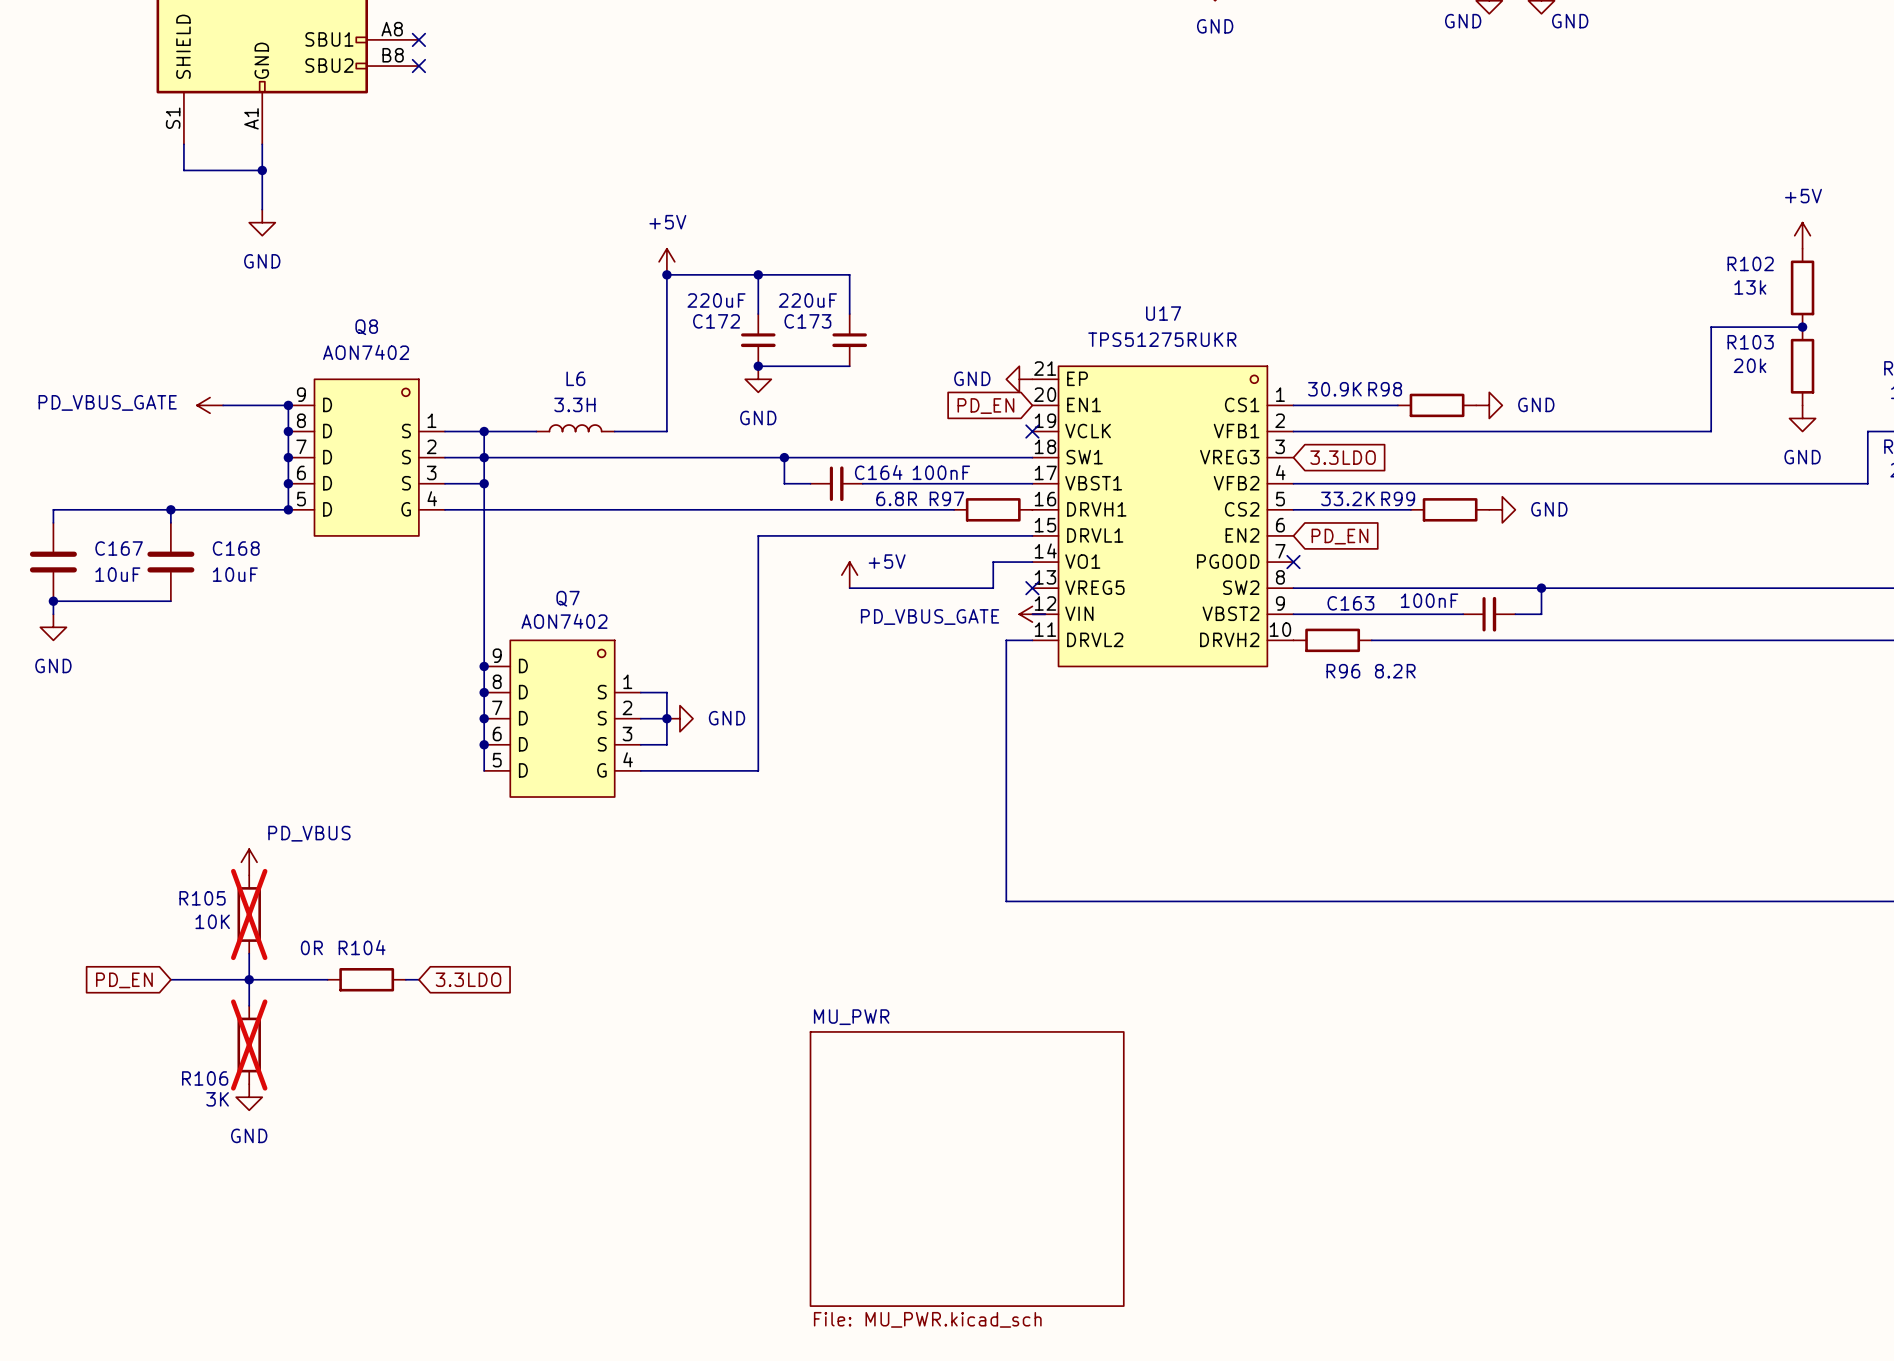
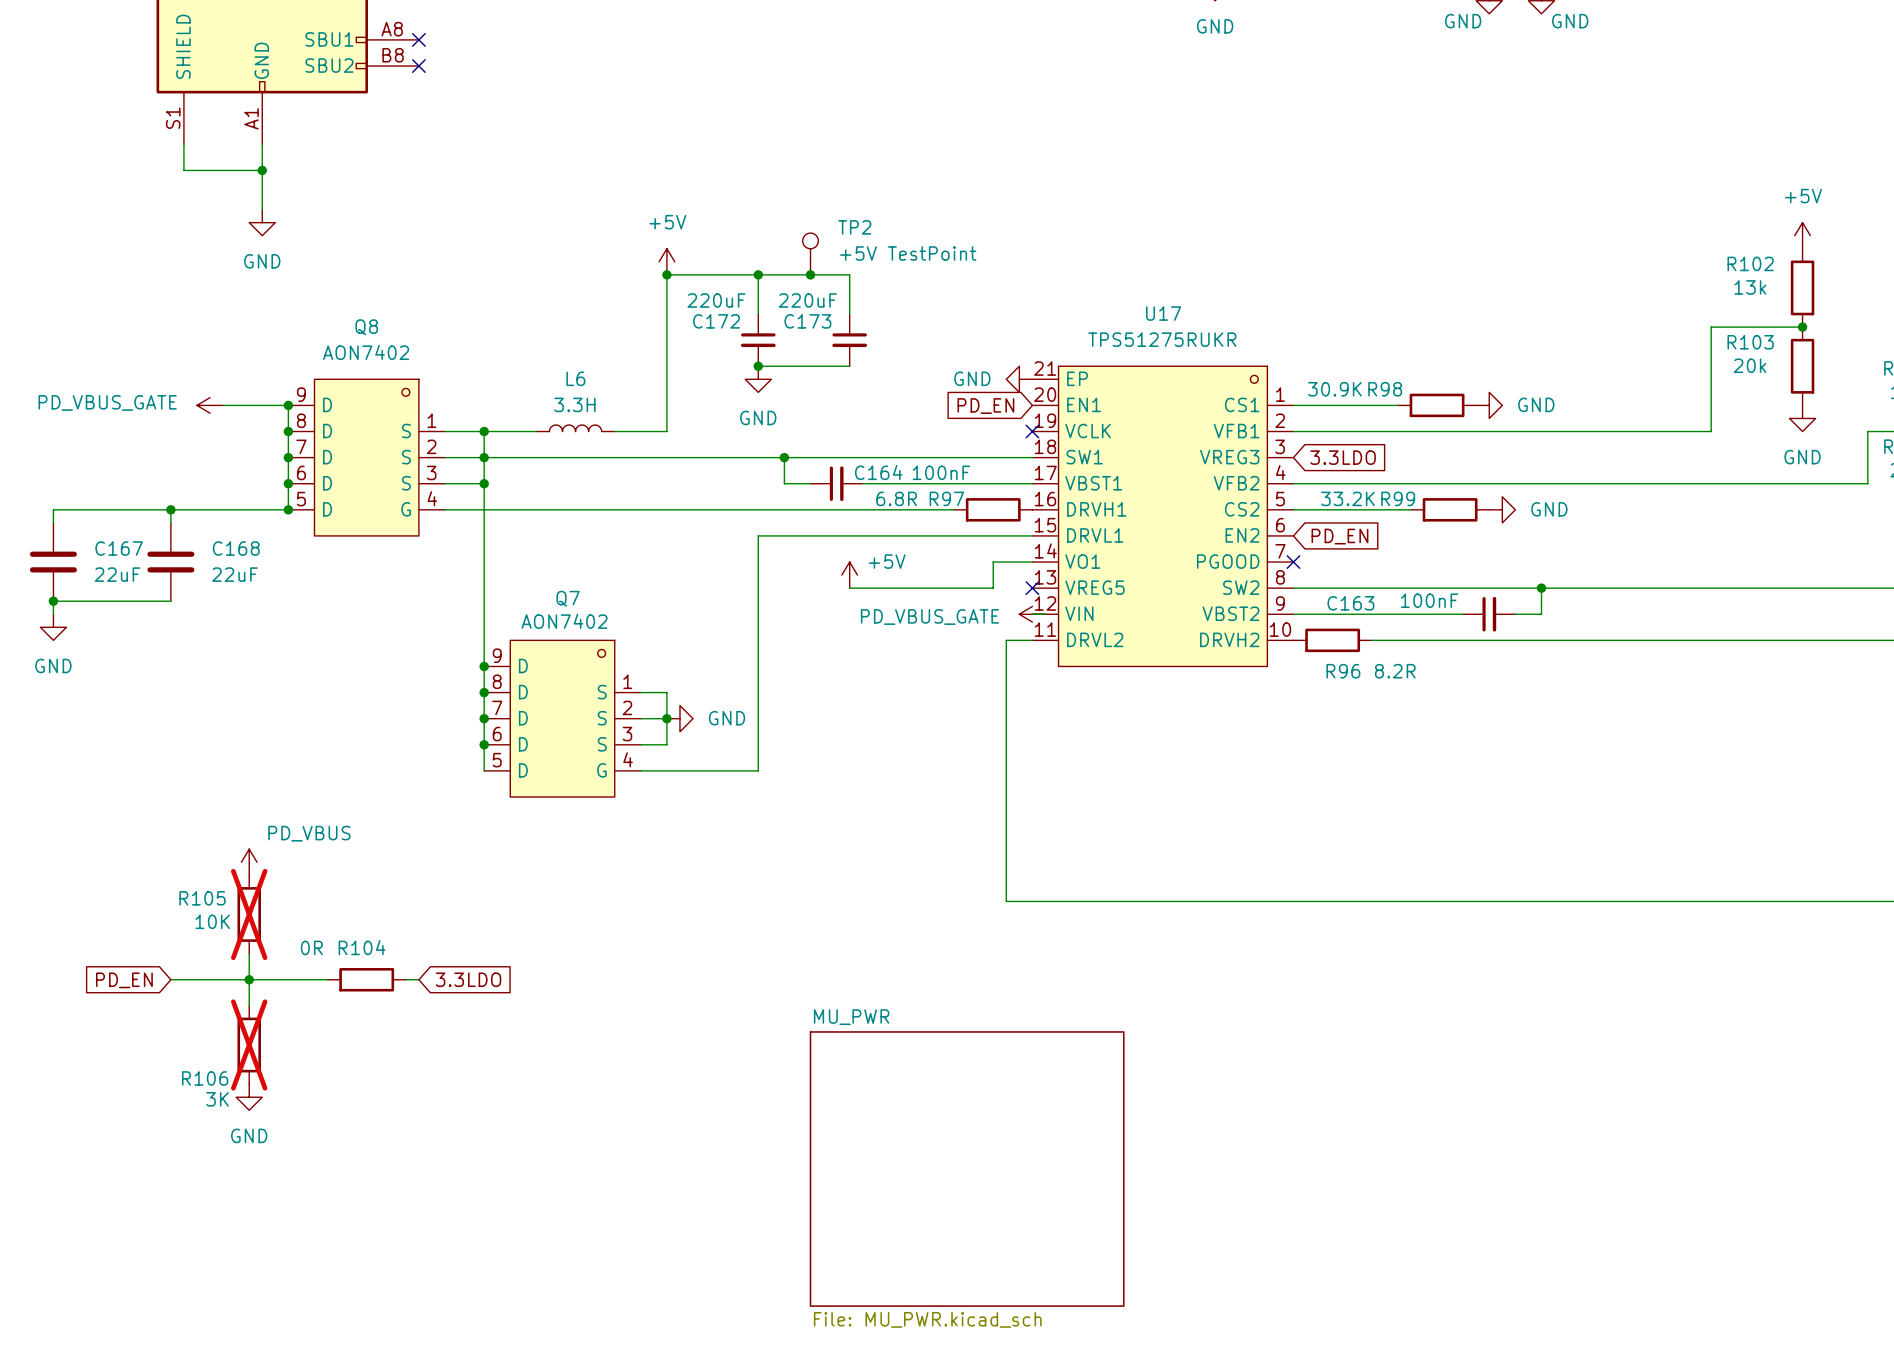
TP2: none -> +5V TestPoint (810, 253)
junction: none -> (810, 274)
C167 value: 10uF (117, 574) -> 22uF (117, 574)
C168 value: 10uF (235, 574) -> 22uF (235, 574)

